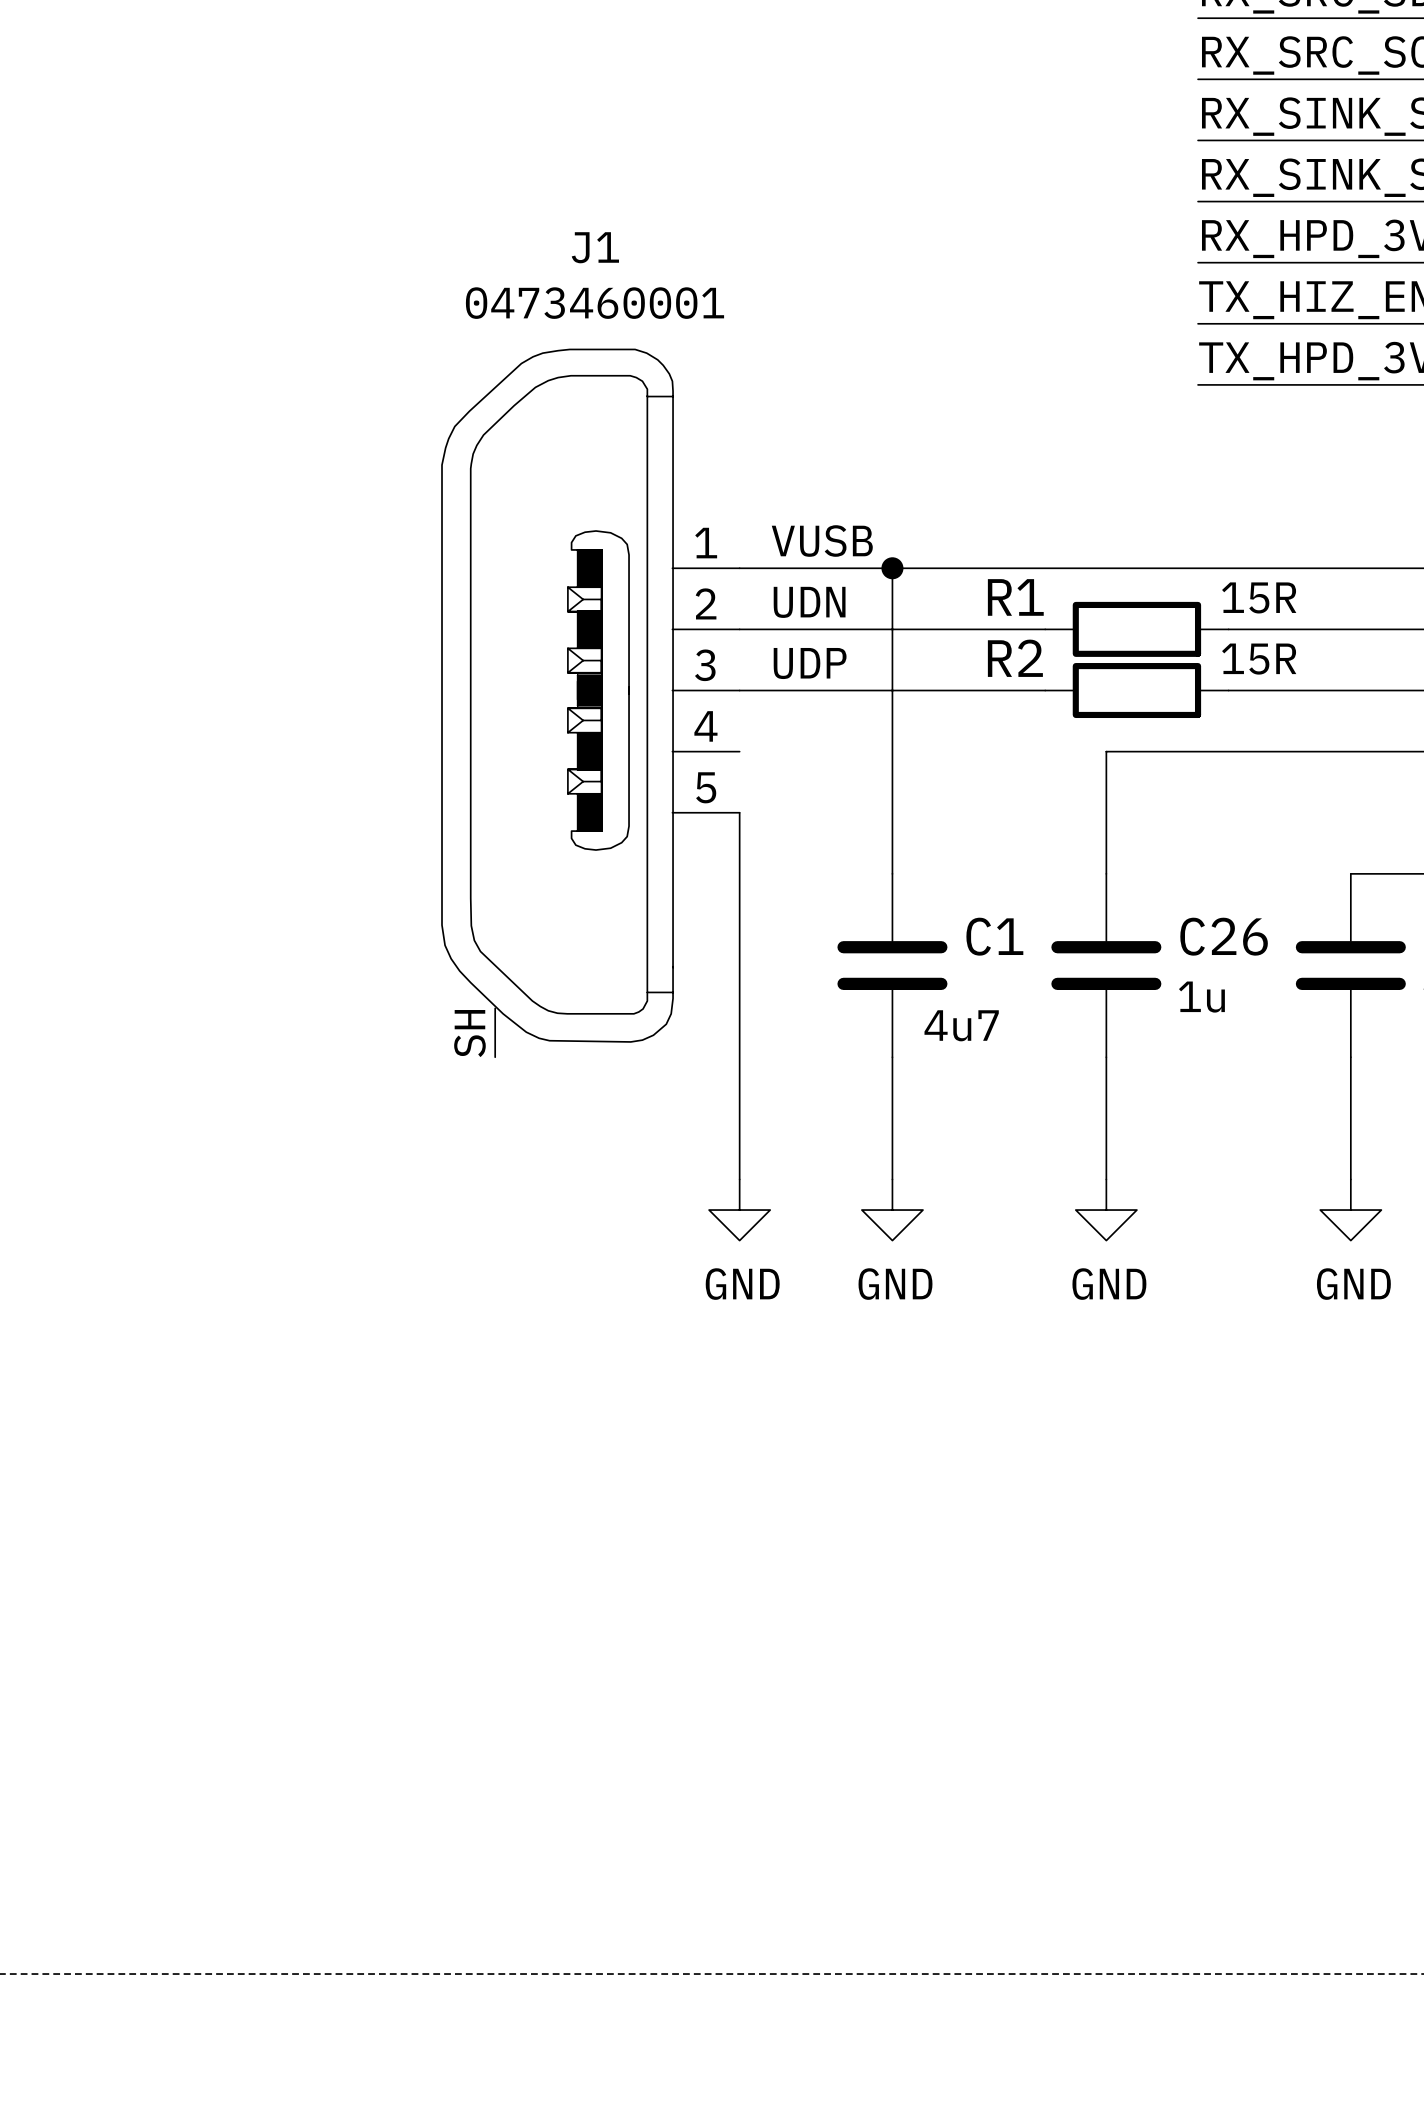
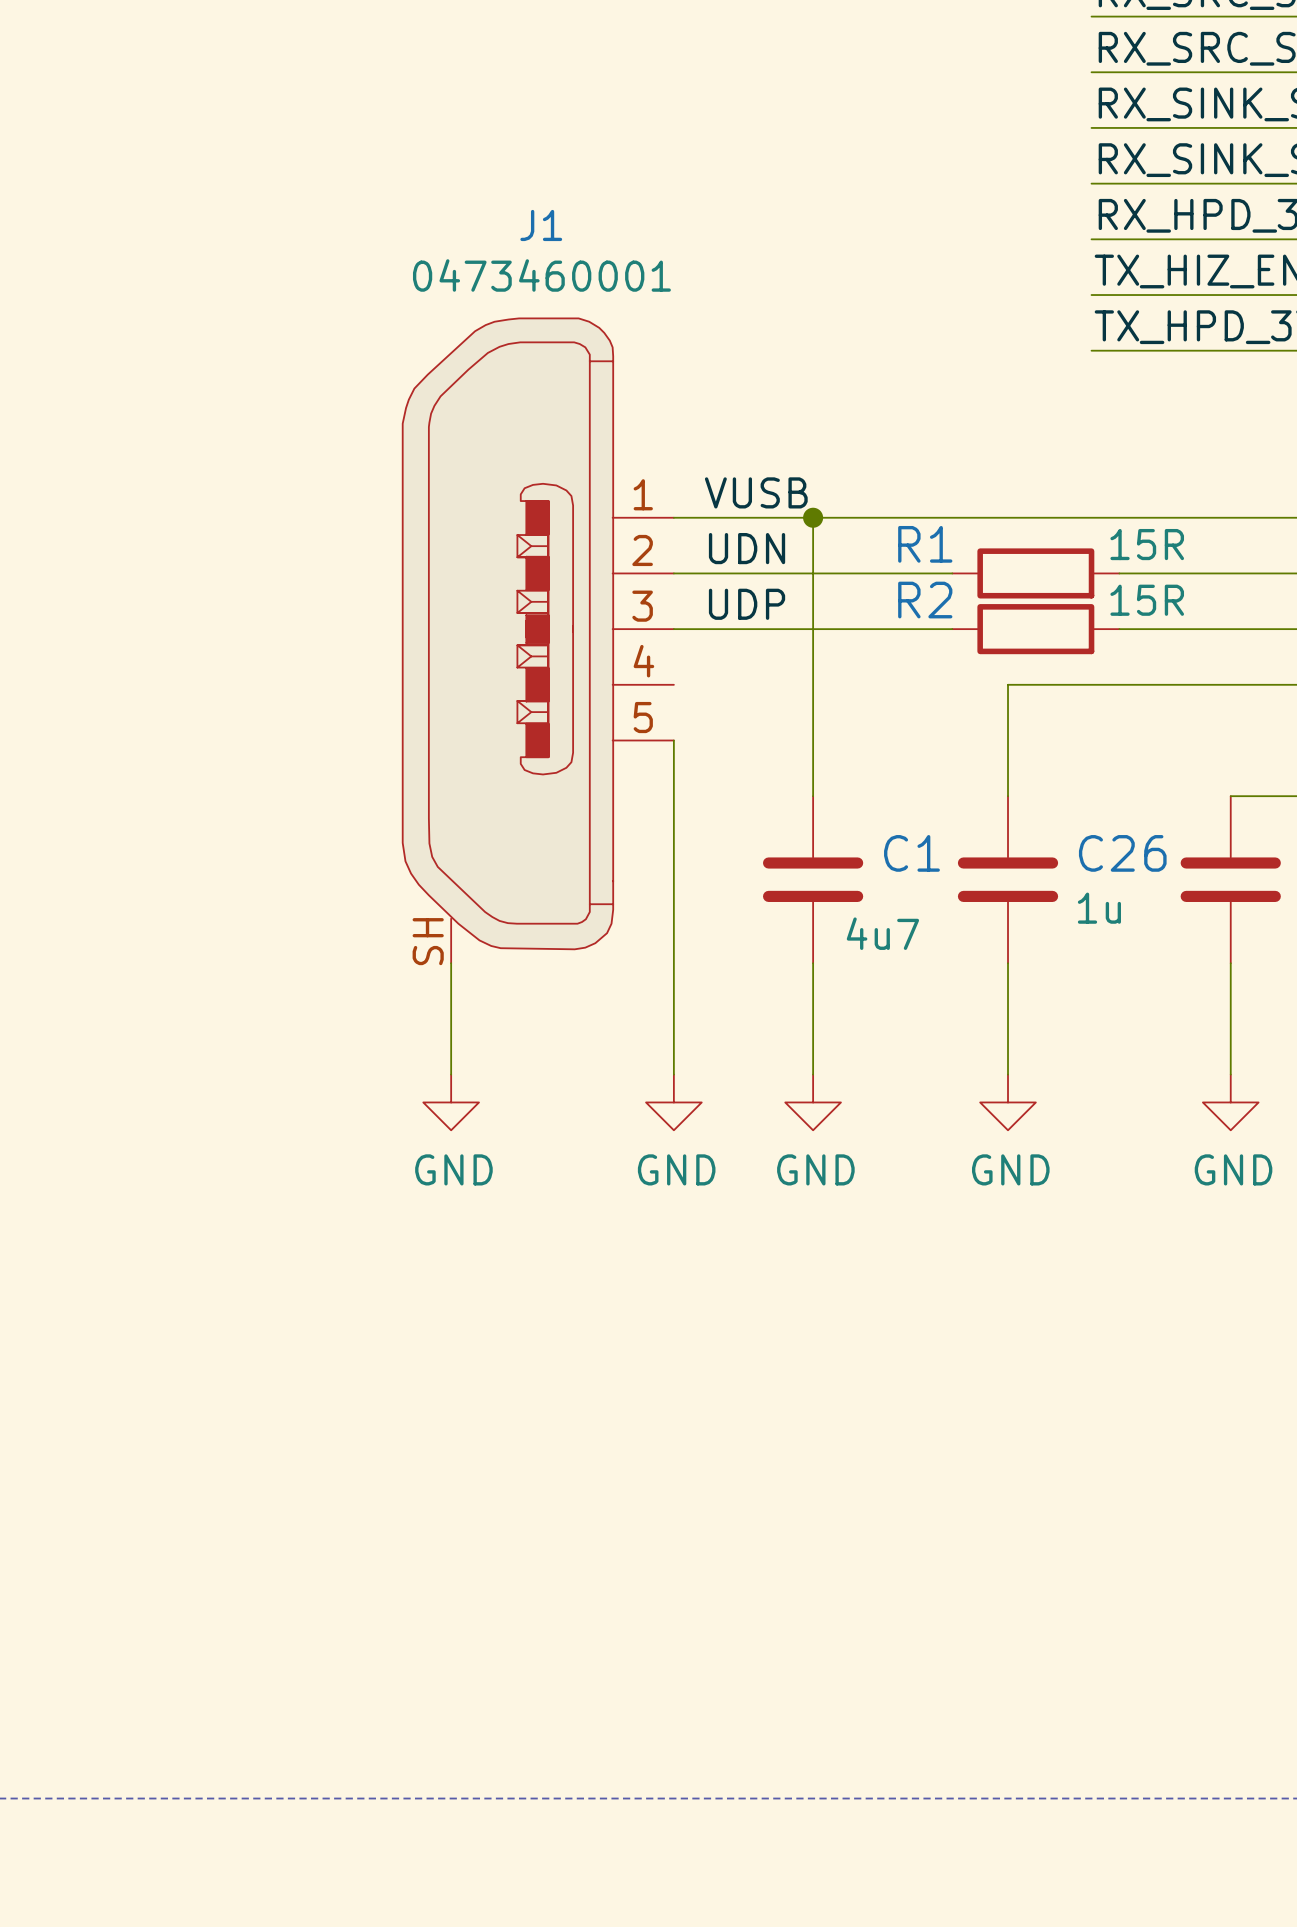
wire: none -> (451, 963) (451, 1074)
power symbol: none -> GND (451, 1102)

